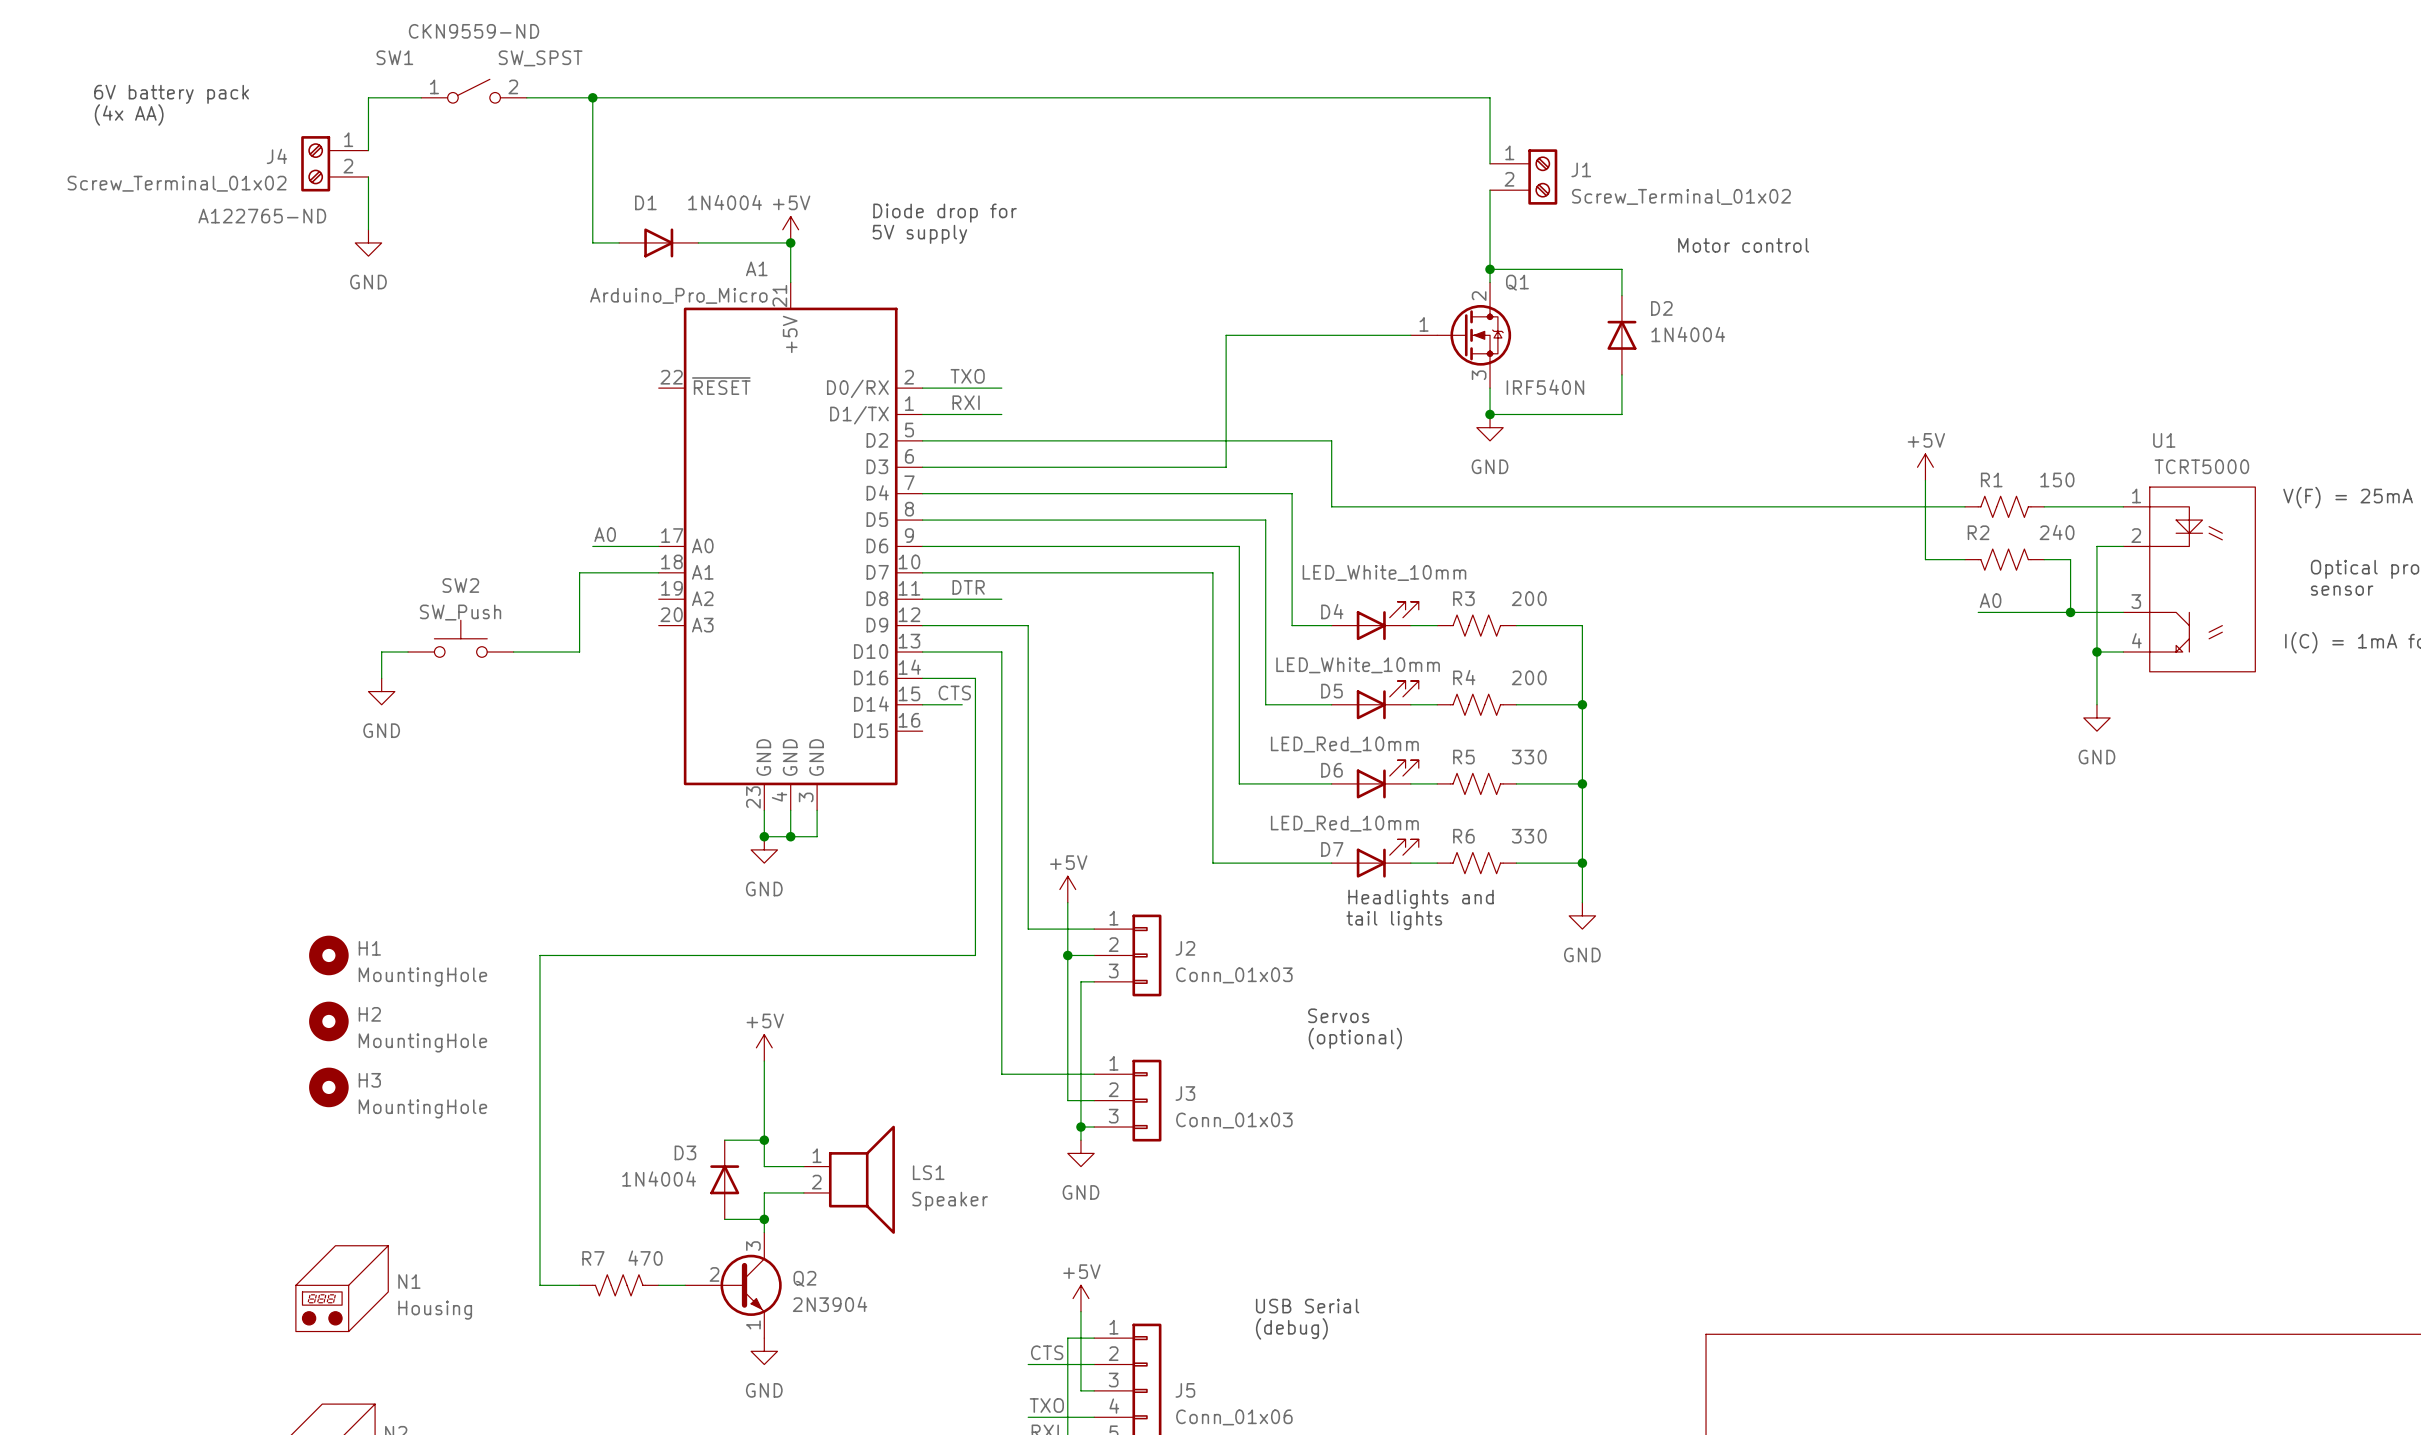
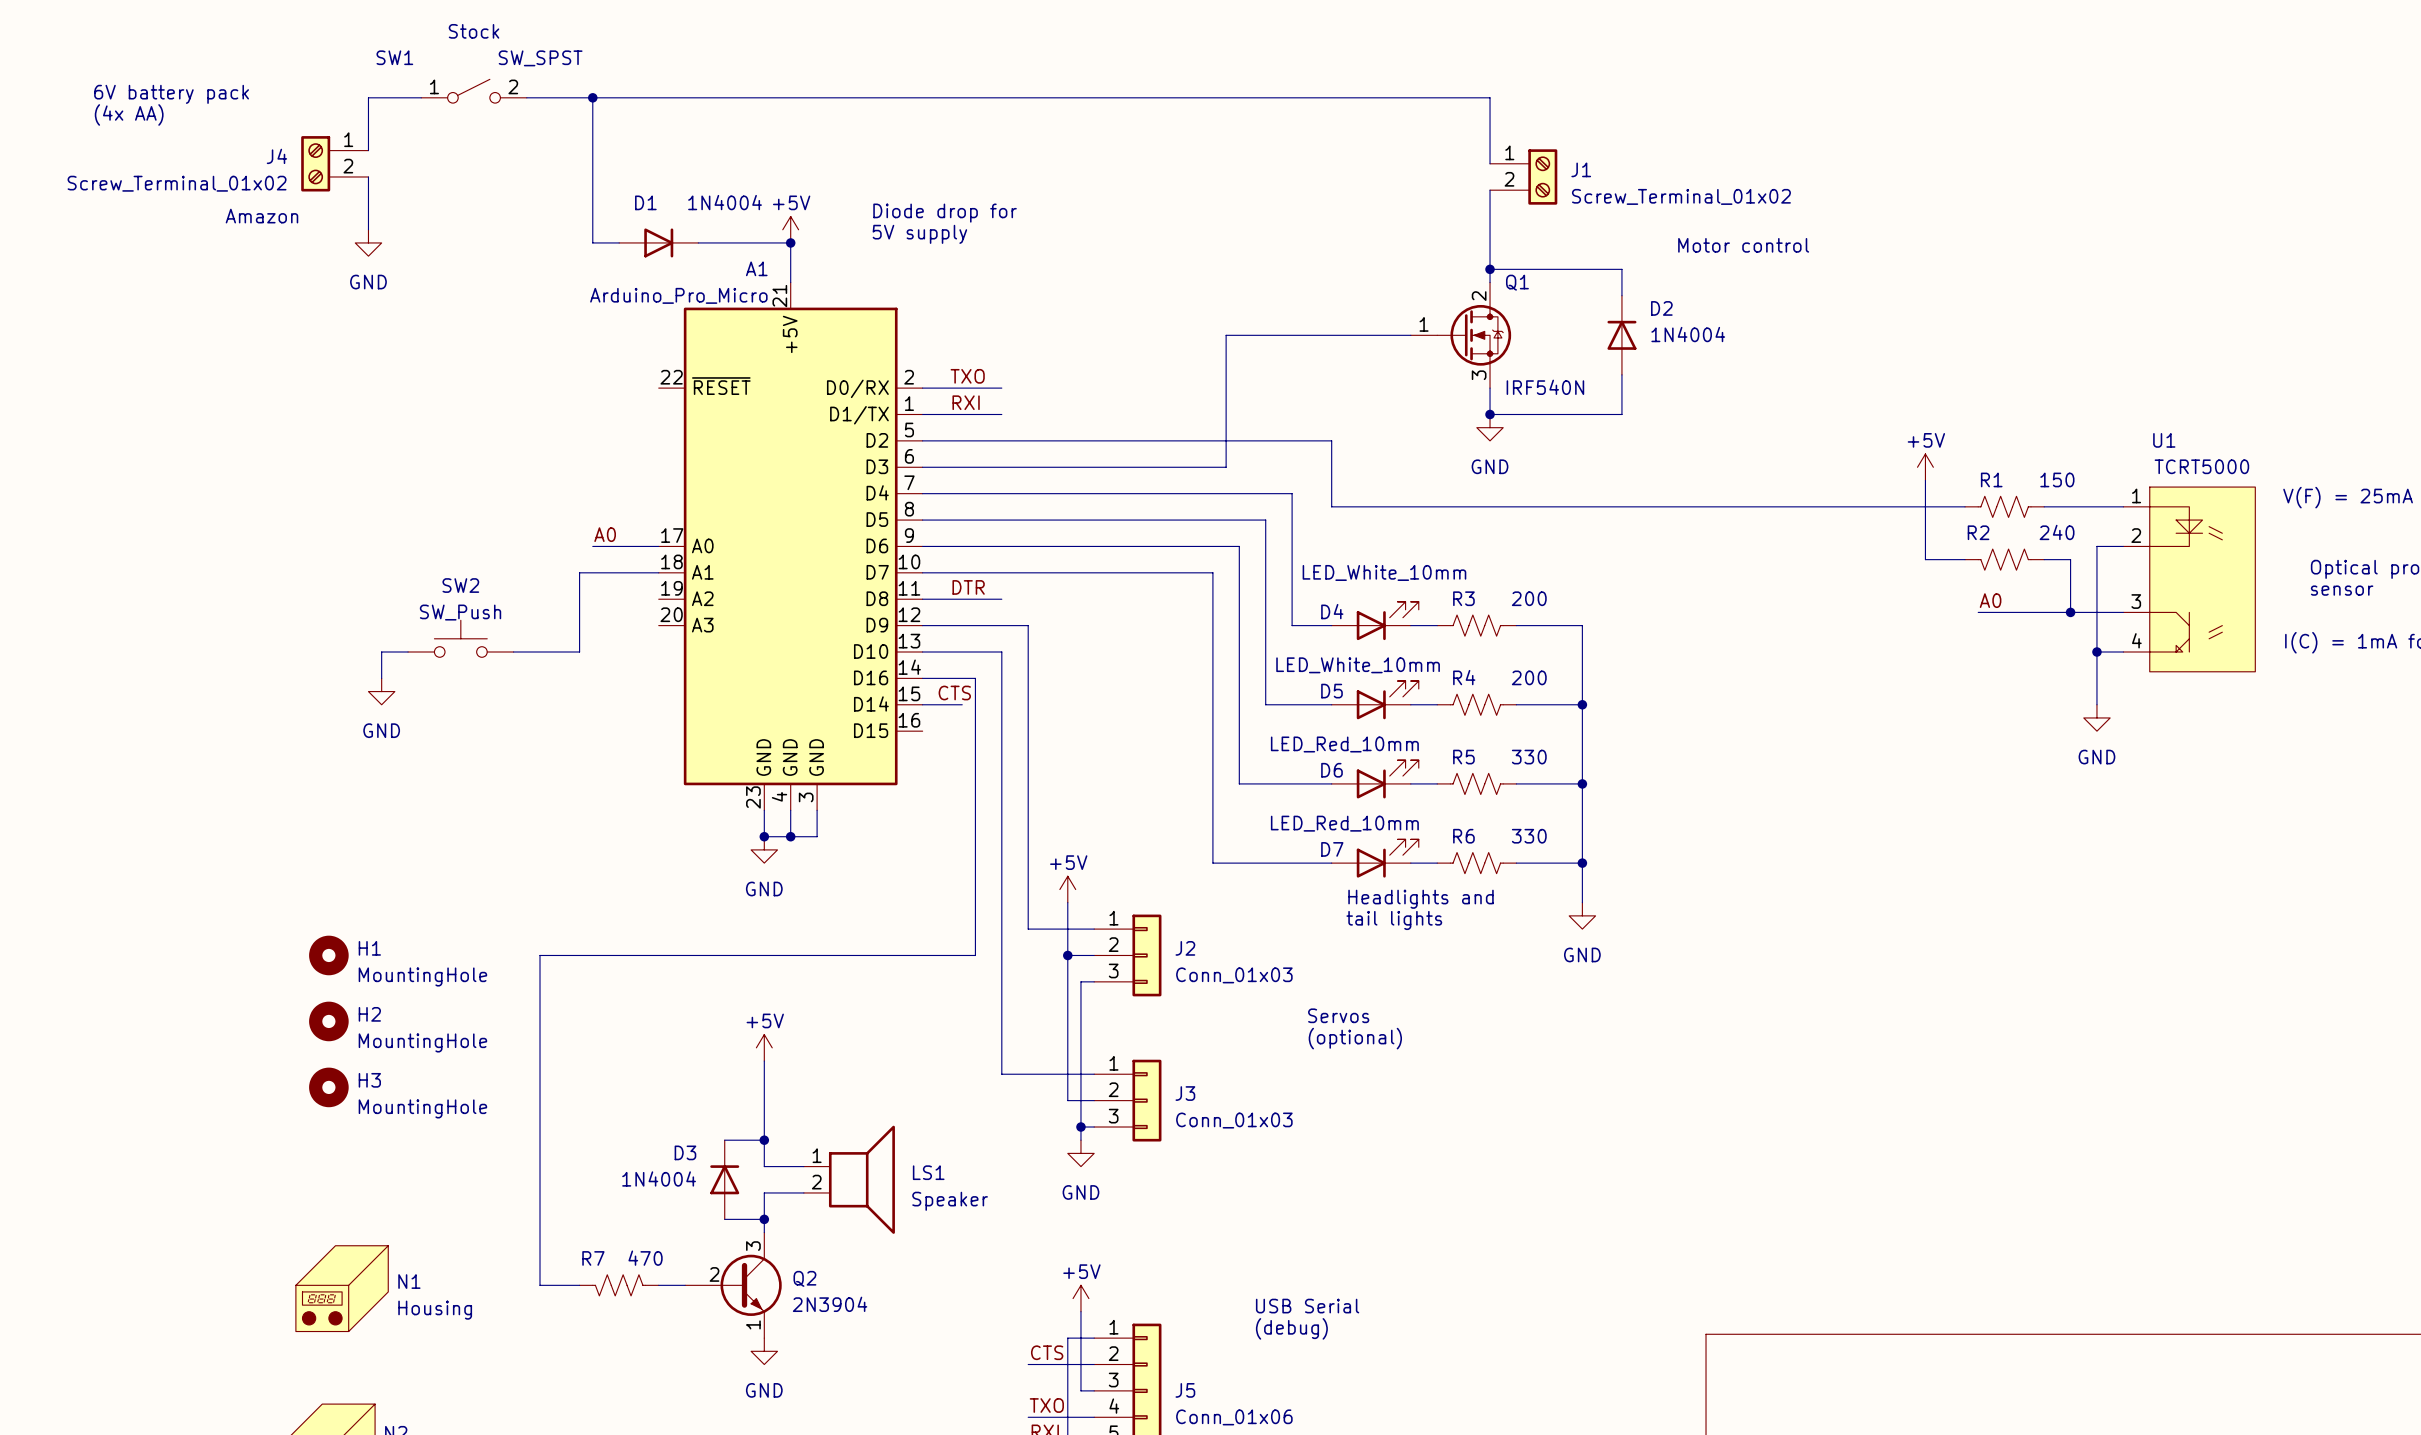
SW1 text: CKN9559-ND (474, 31) -> Stock (474, 31)
J4 text: A122765-ND (262, 216) -> Amazon (261, 216)

